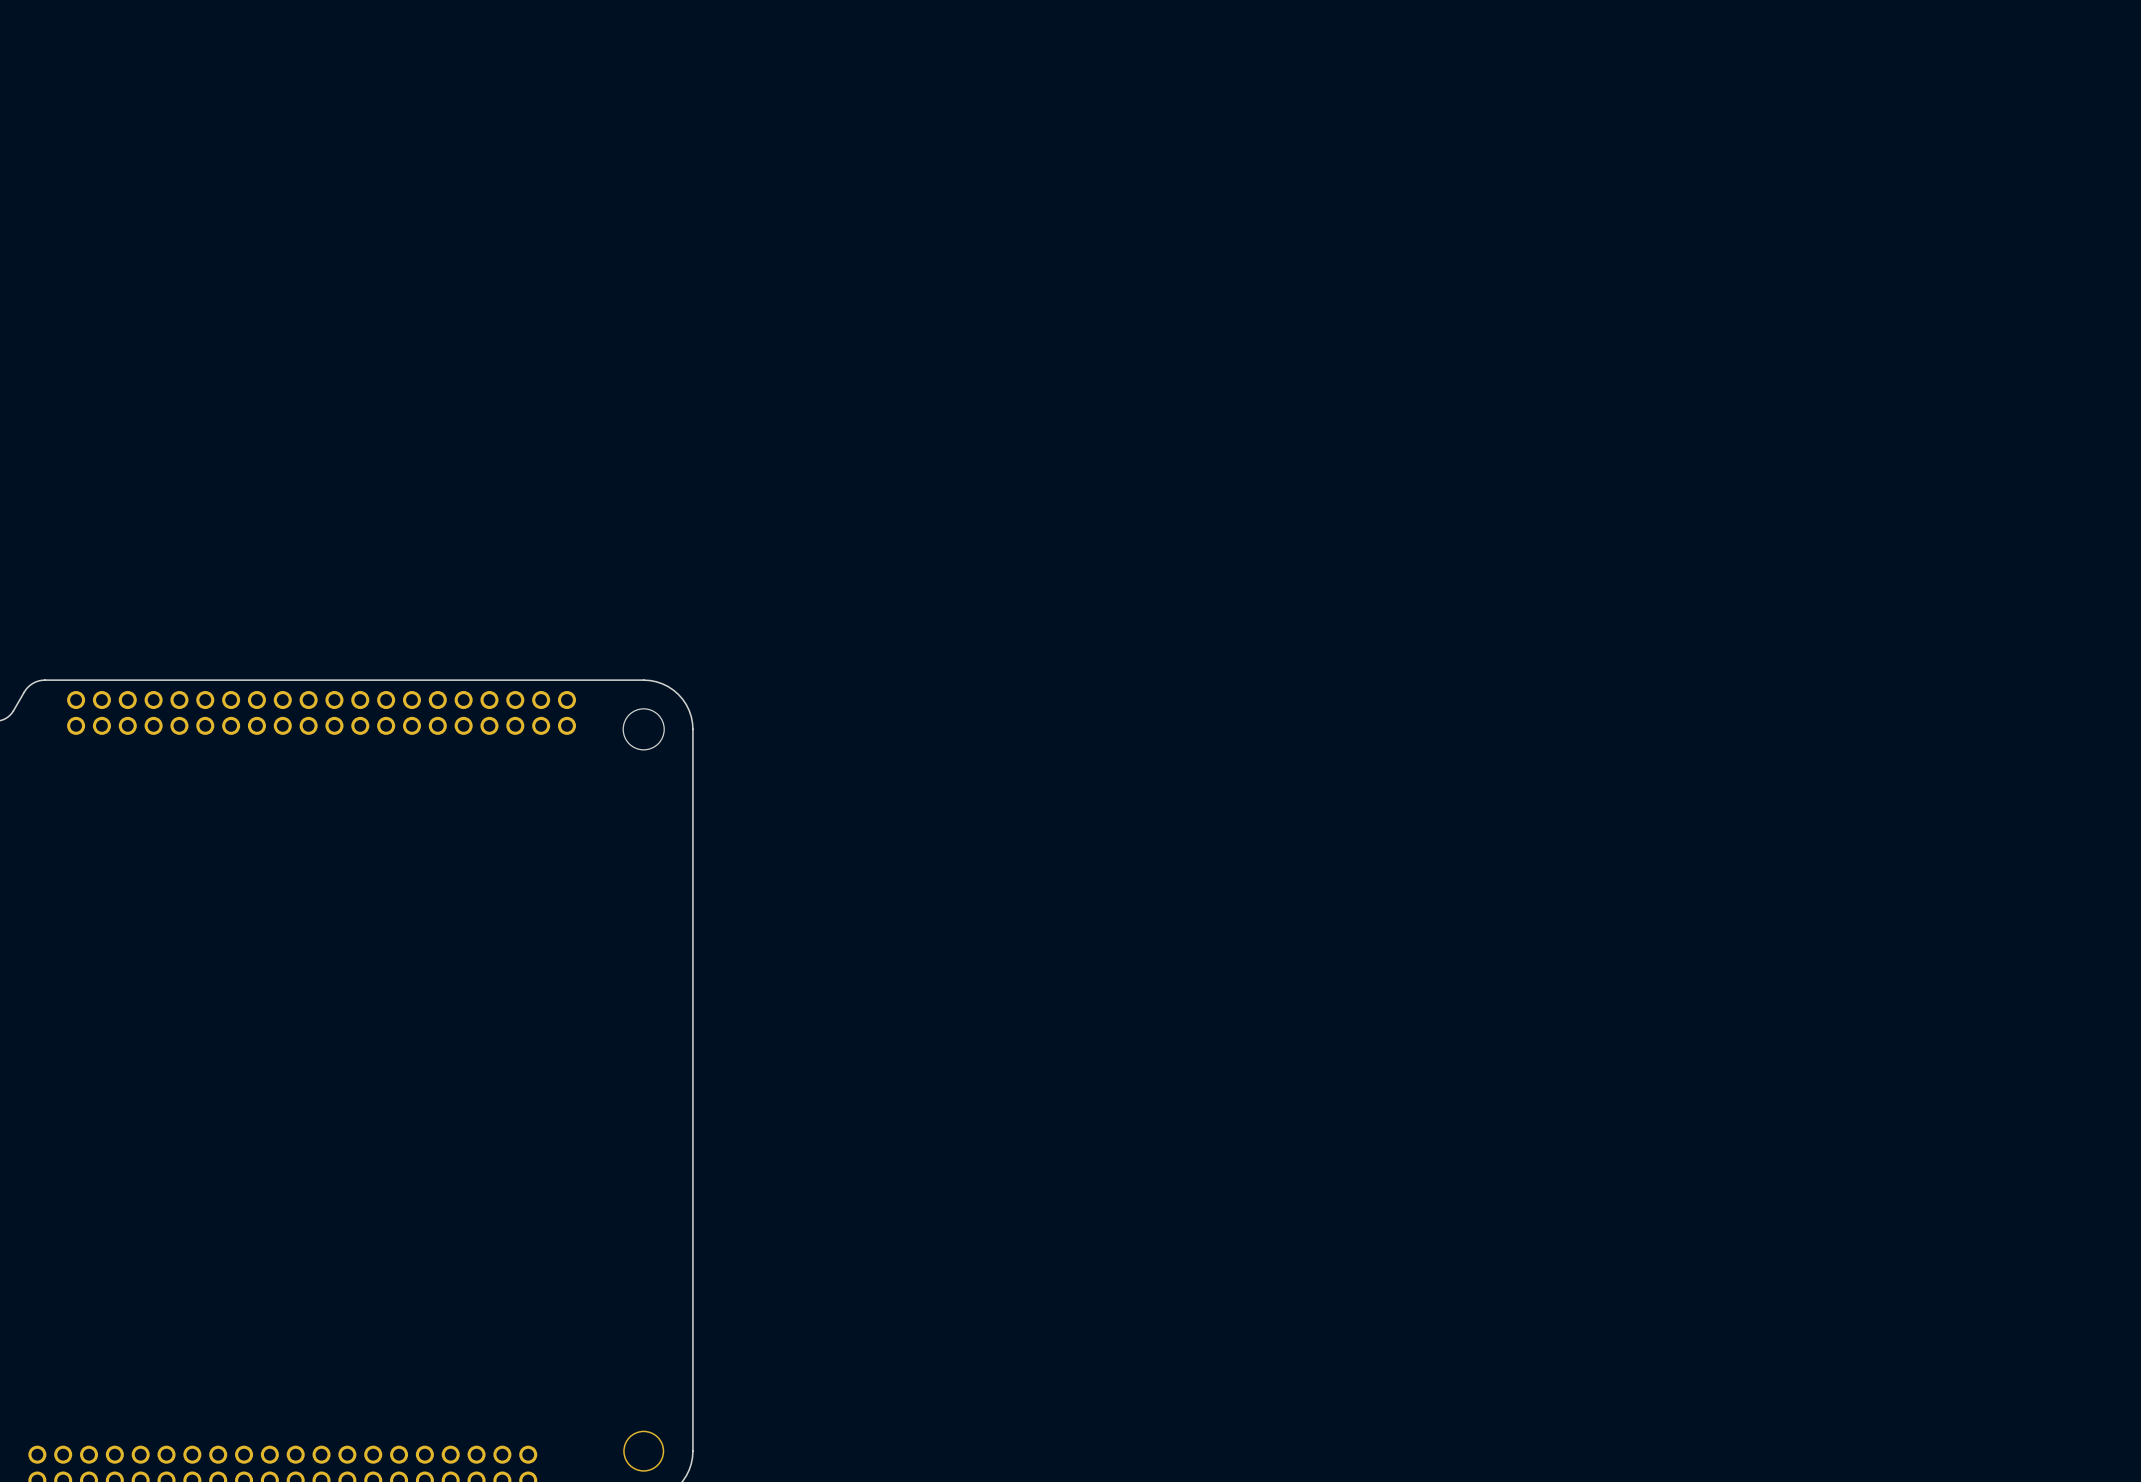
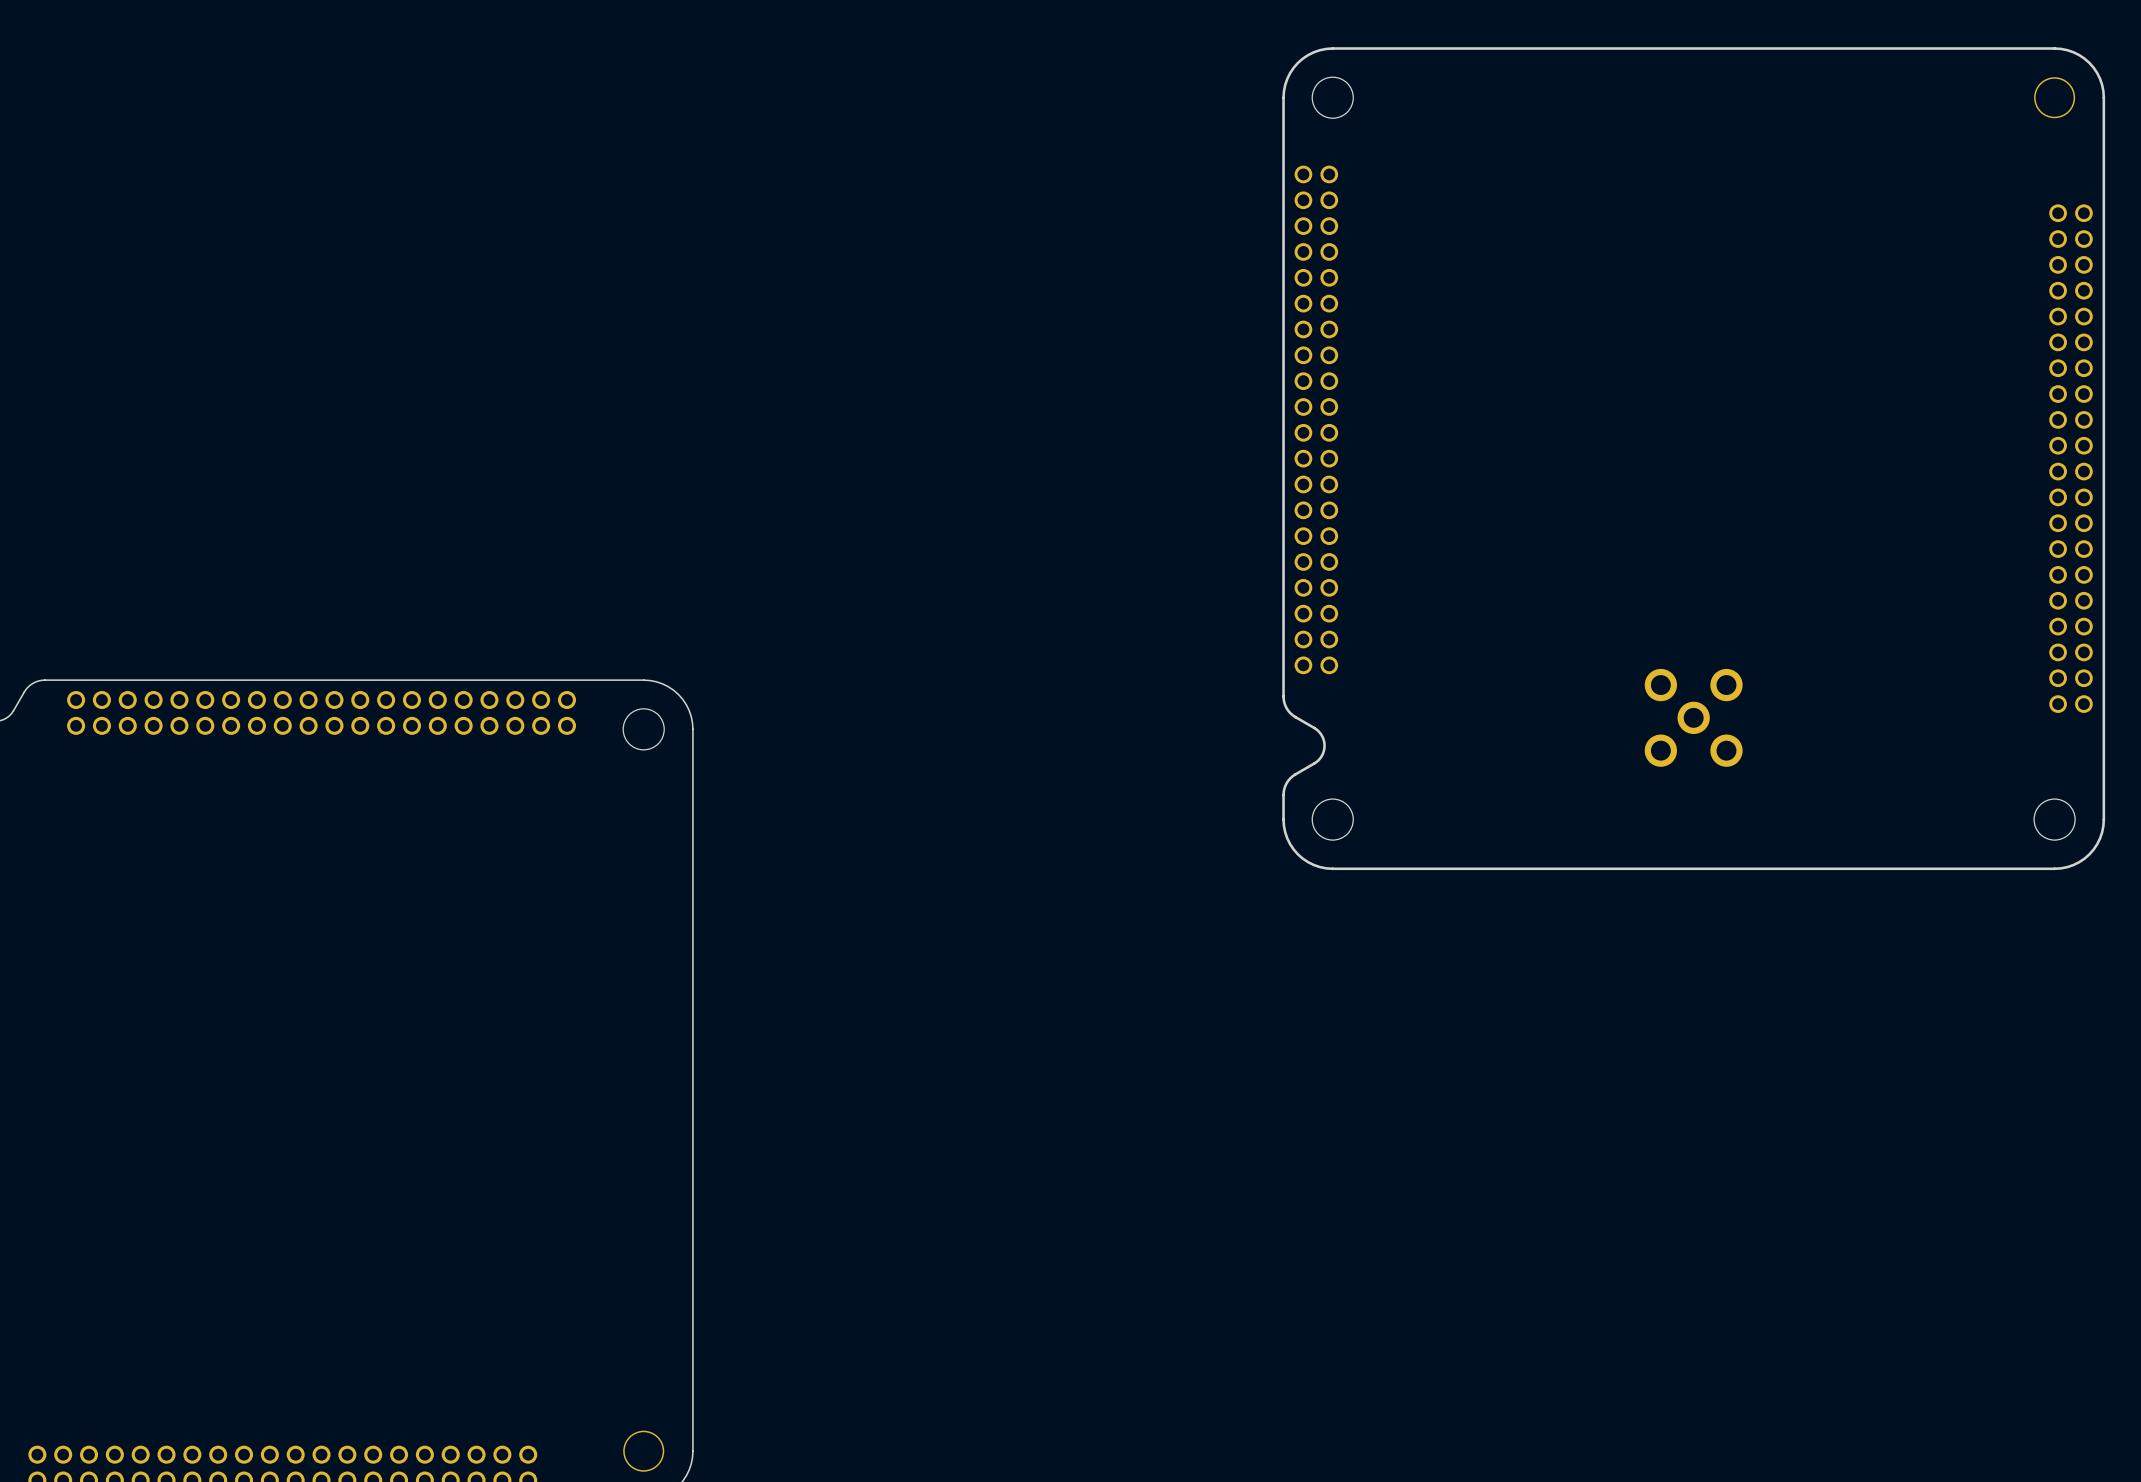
part: none -> (1693, 458)
part: none -> (1693, 717)

